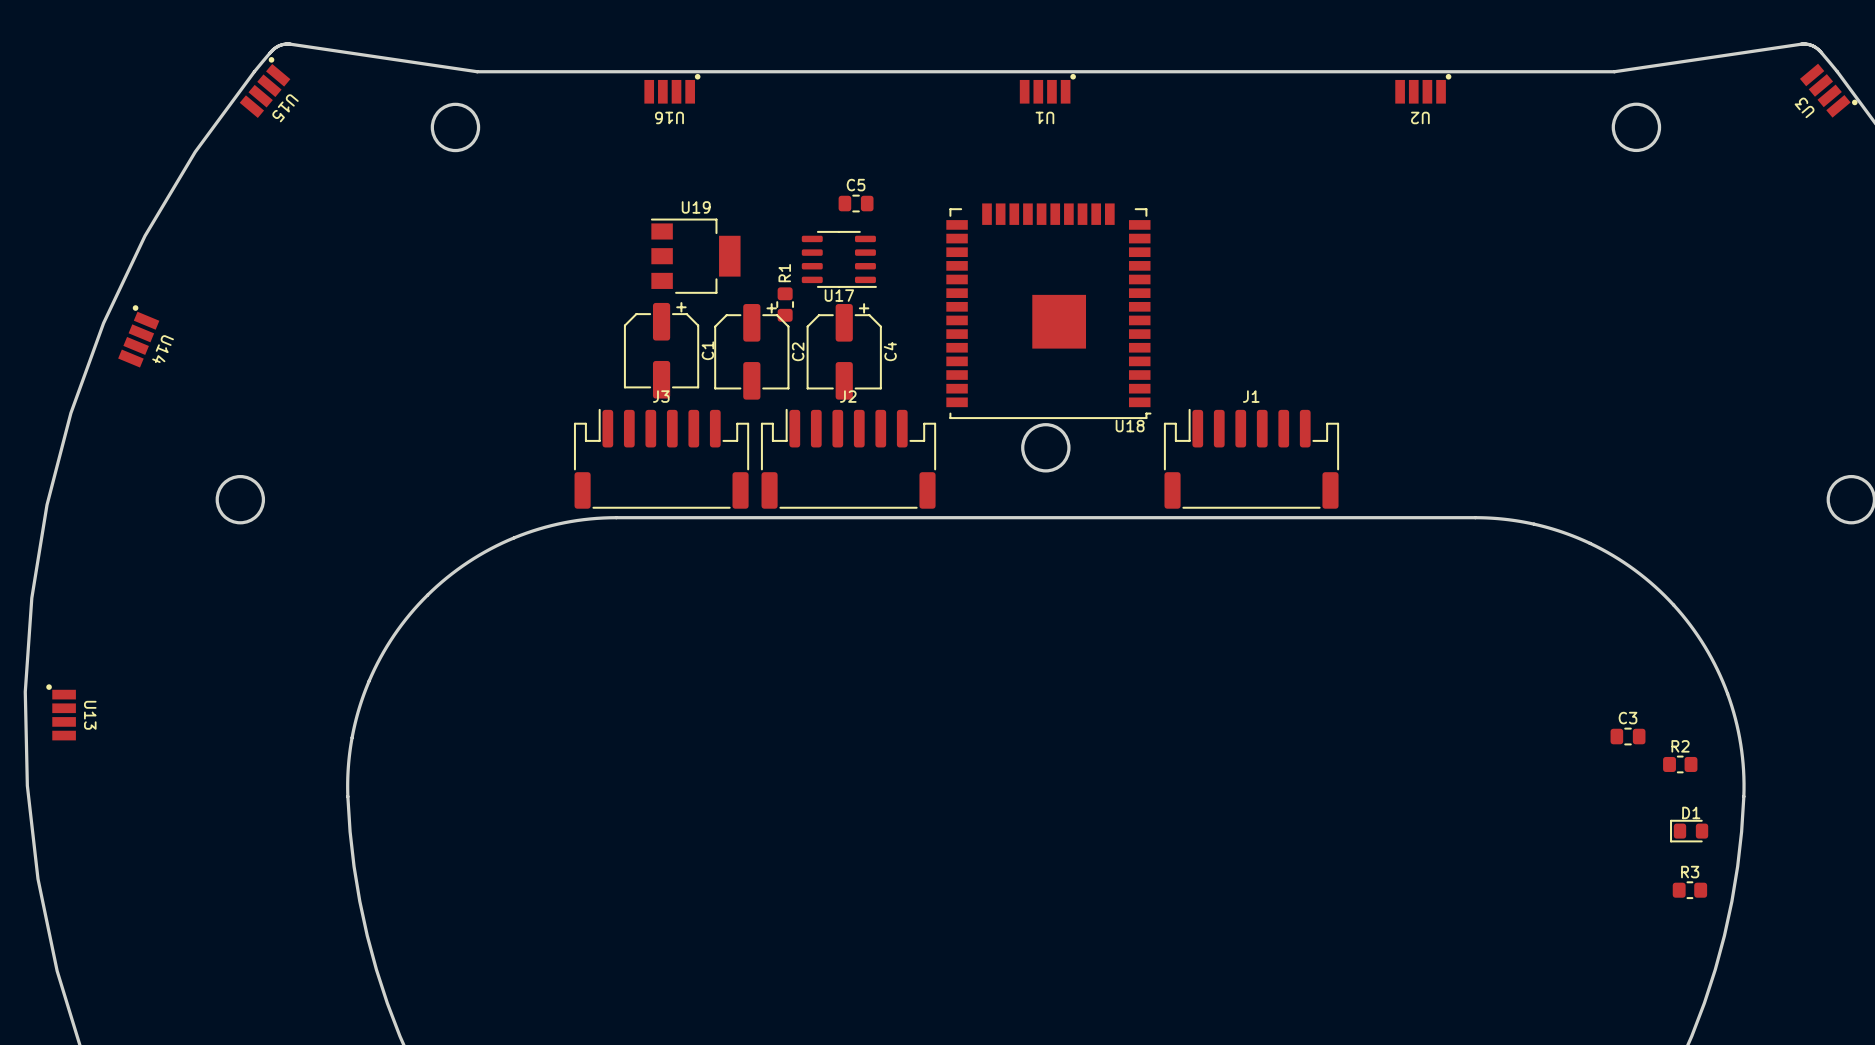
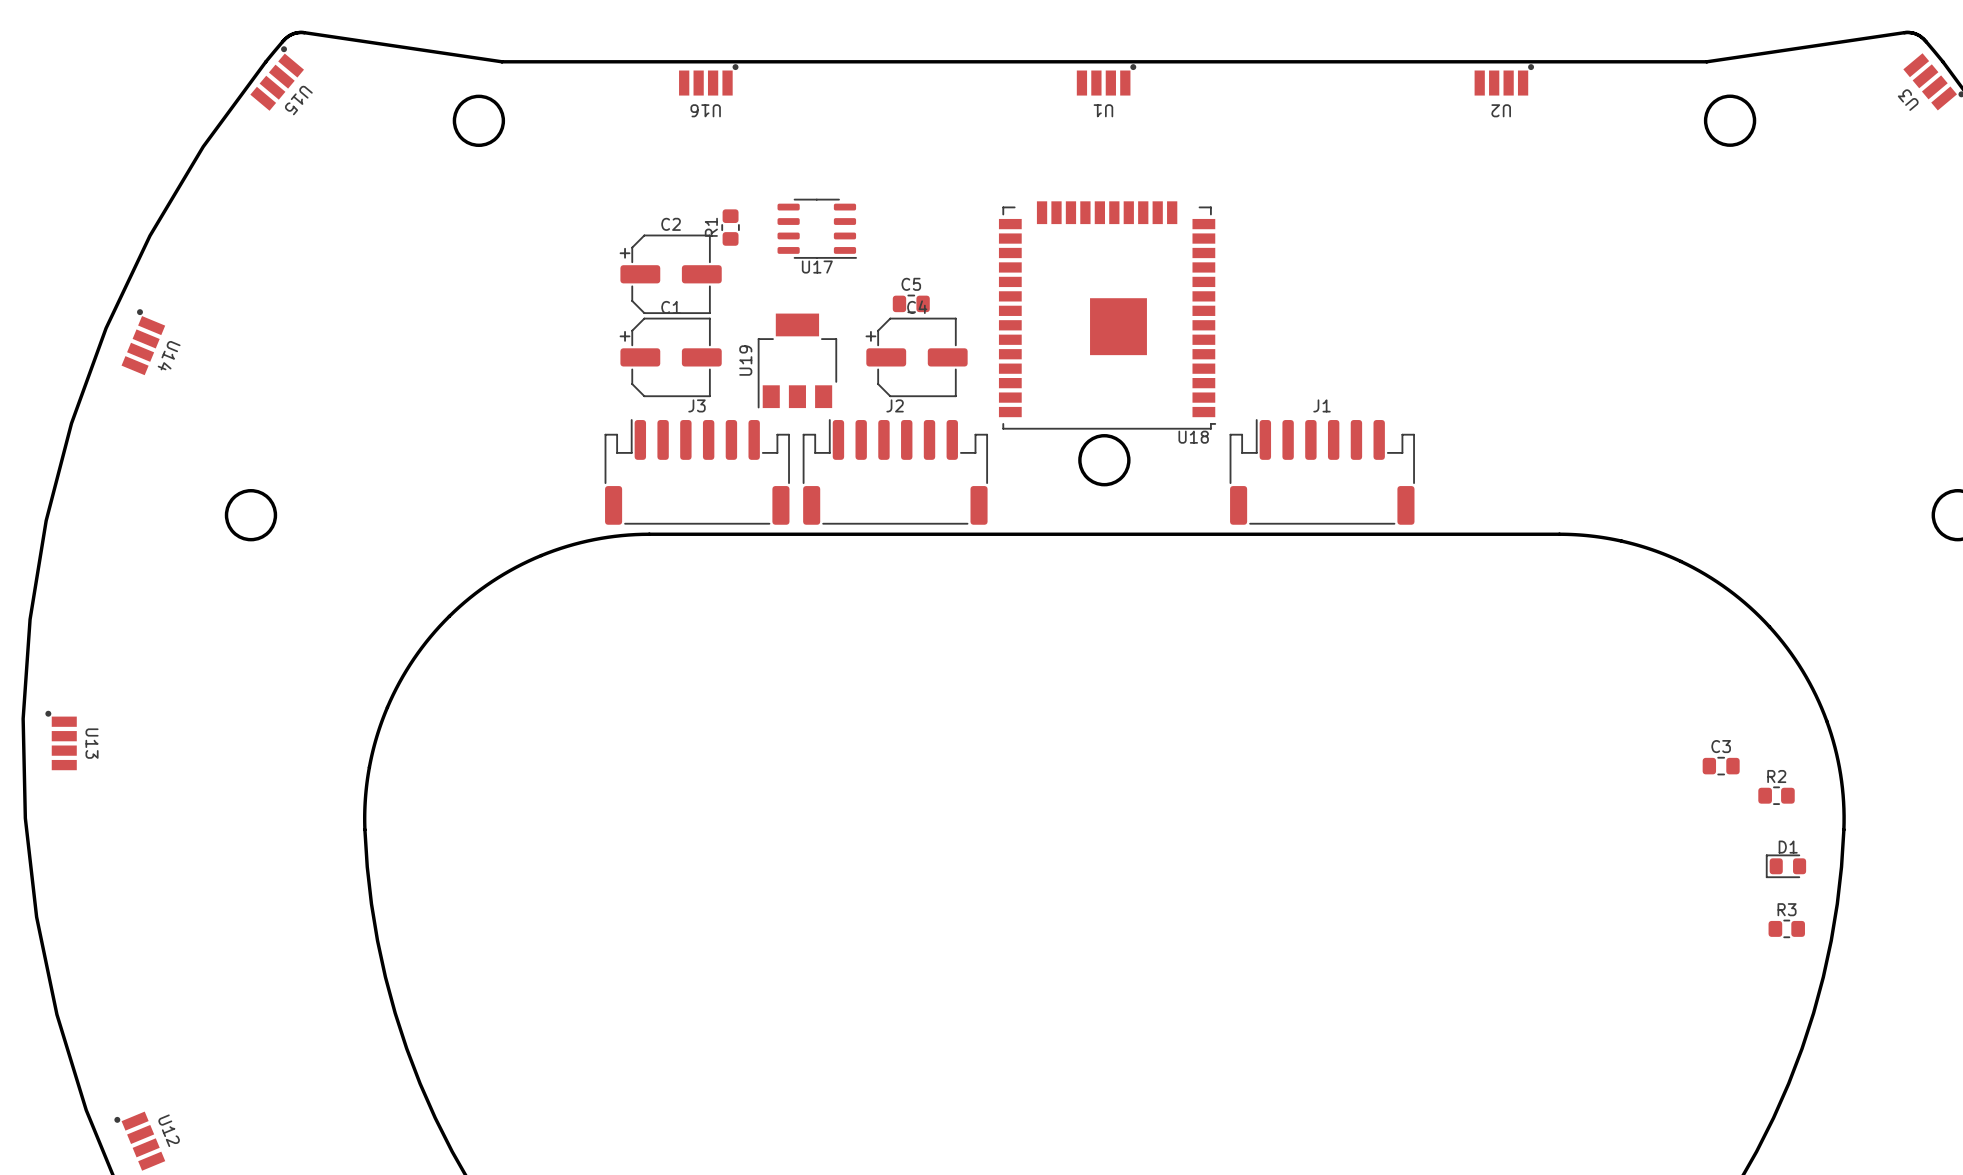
C5 position: (856, 203) -> (911, 303)
U19 rotation: 0° (695, 256) -> 90° counterclockwise (797, 360)
U19 position: (695, 256) -> (797, 360)
U17 position: (839, 259) -> (817, 228)
R1 name position: R1 (784, 273) -> R1 (711, 227)
C2 footprint: [714, 303, 790, 400] -> [619, 234, 722, 314]
R1 position: (785, 304) -> (730, 227)
C1 rotation: 0° (661, 350) -> 90° counterclockwise (670, 357)
C2 name position: C2 (798, 351) -> C2 (671, 224)
C4 rotation: 0° (844, 351) -> 90° counterclockwise (916, 357)

